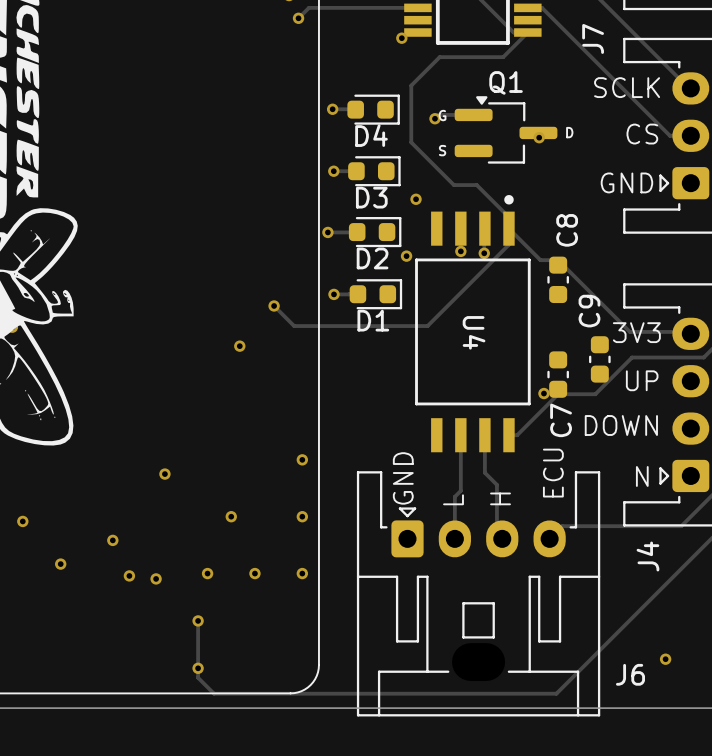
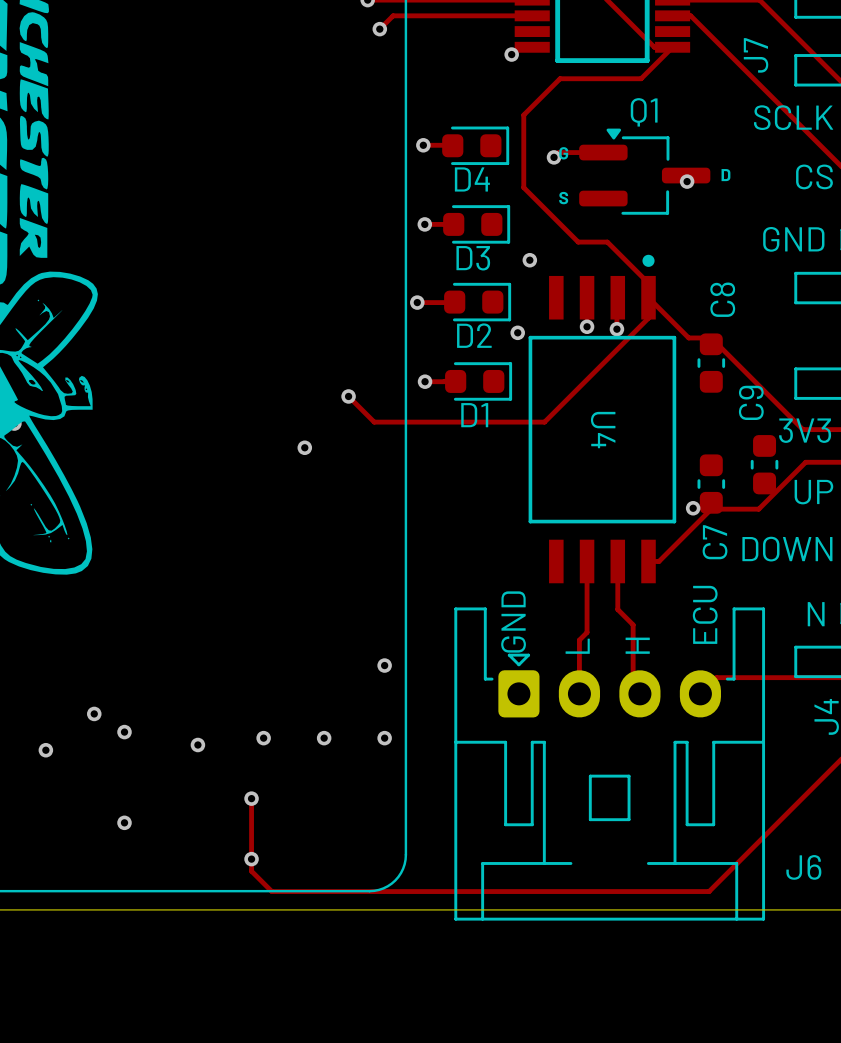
via: (302, 459) -> none
via: (164, 474) -> none
via: (231, 516) -> none
via: (22, 521) -> none
via: (112, 540) -> none
via: none -> (94, 713)
via: (60, 564) -> none
via: none -> (124, 732)
via: (129, 575) -> none
via: none -> (45, 750)
via: none -> (124, 822)

